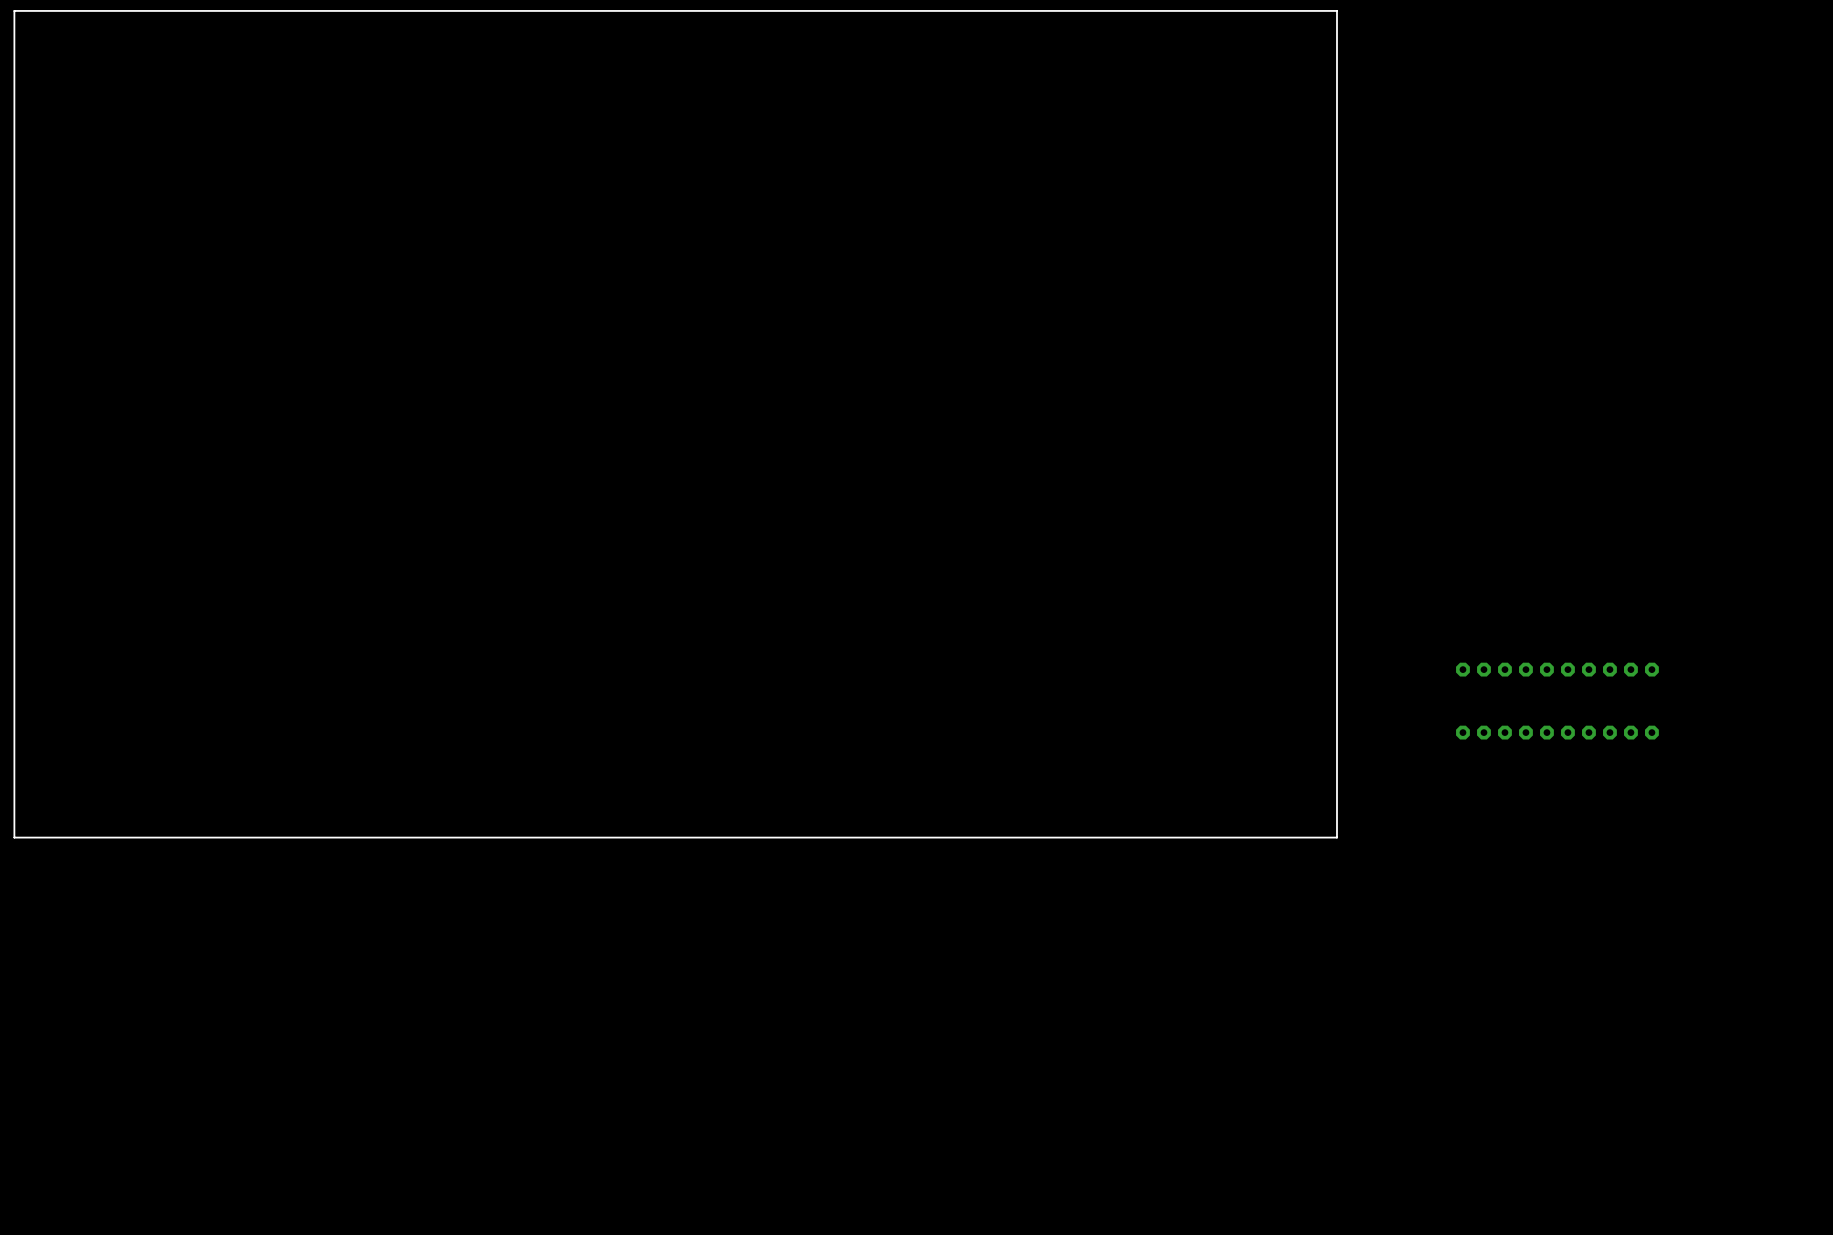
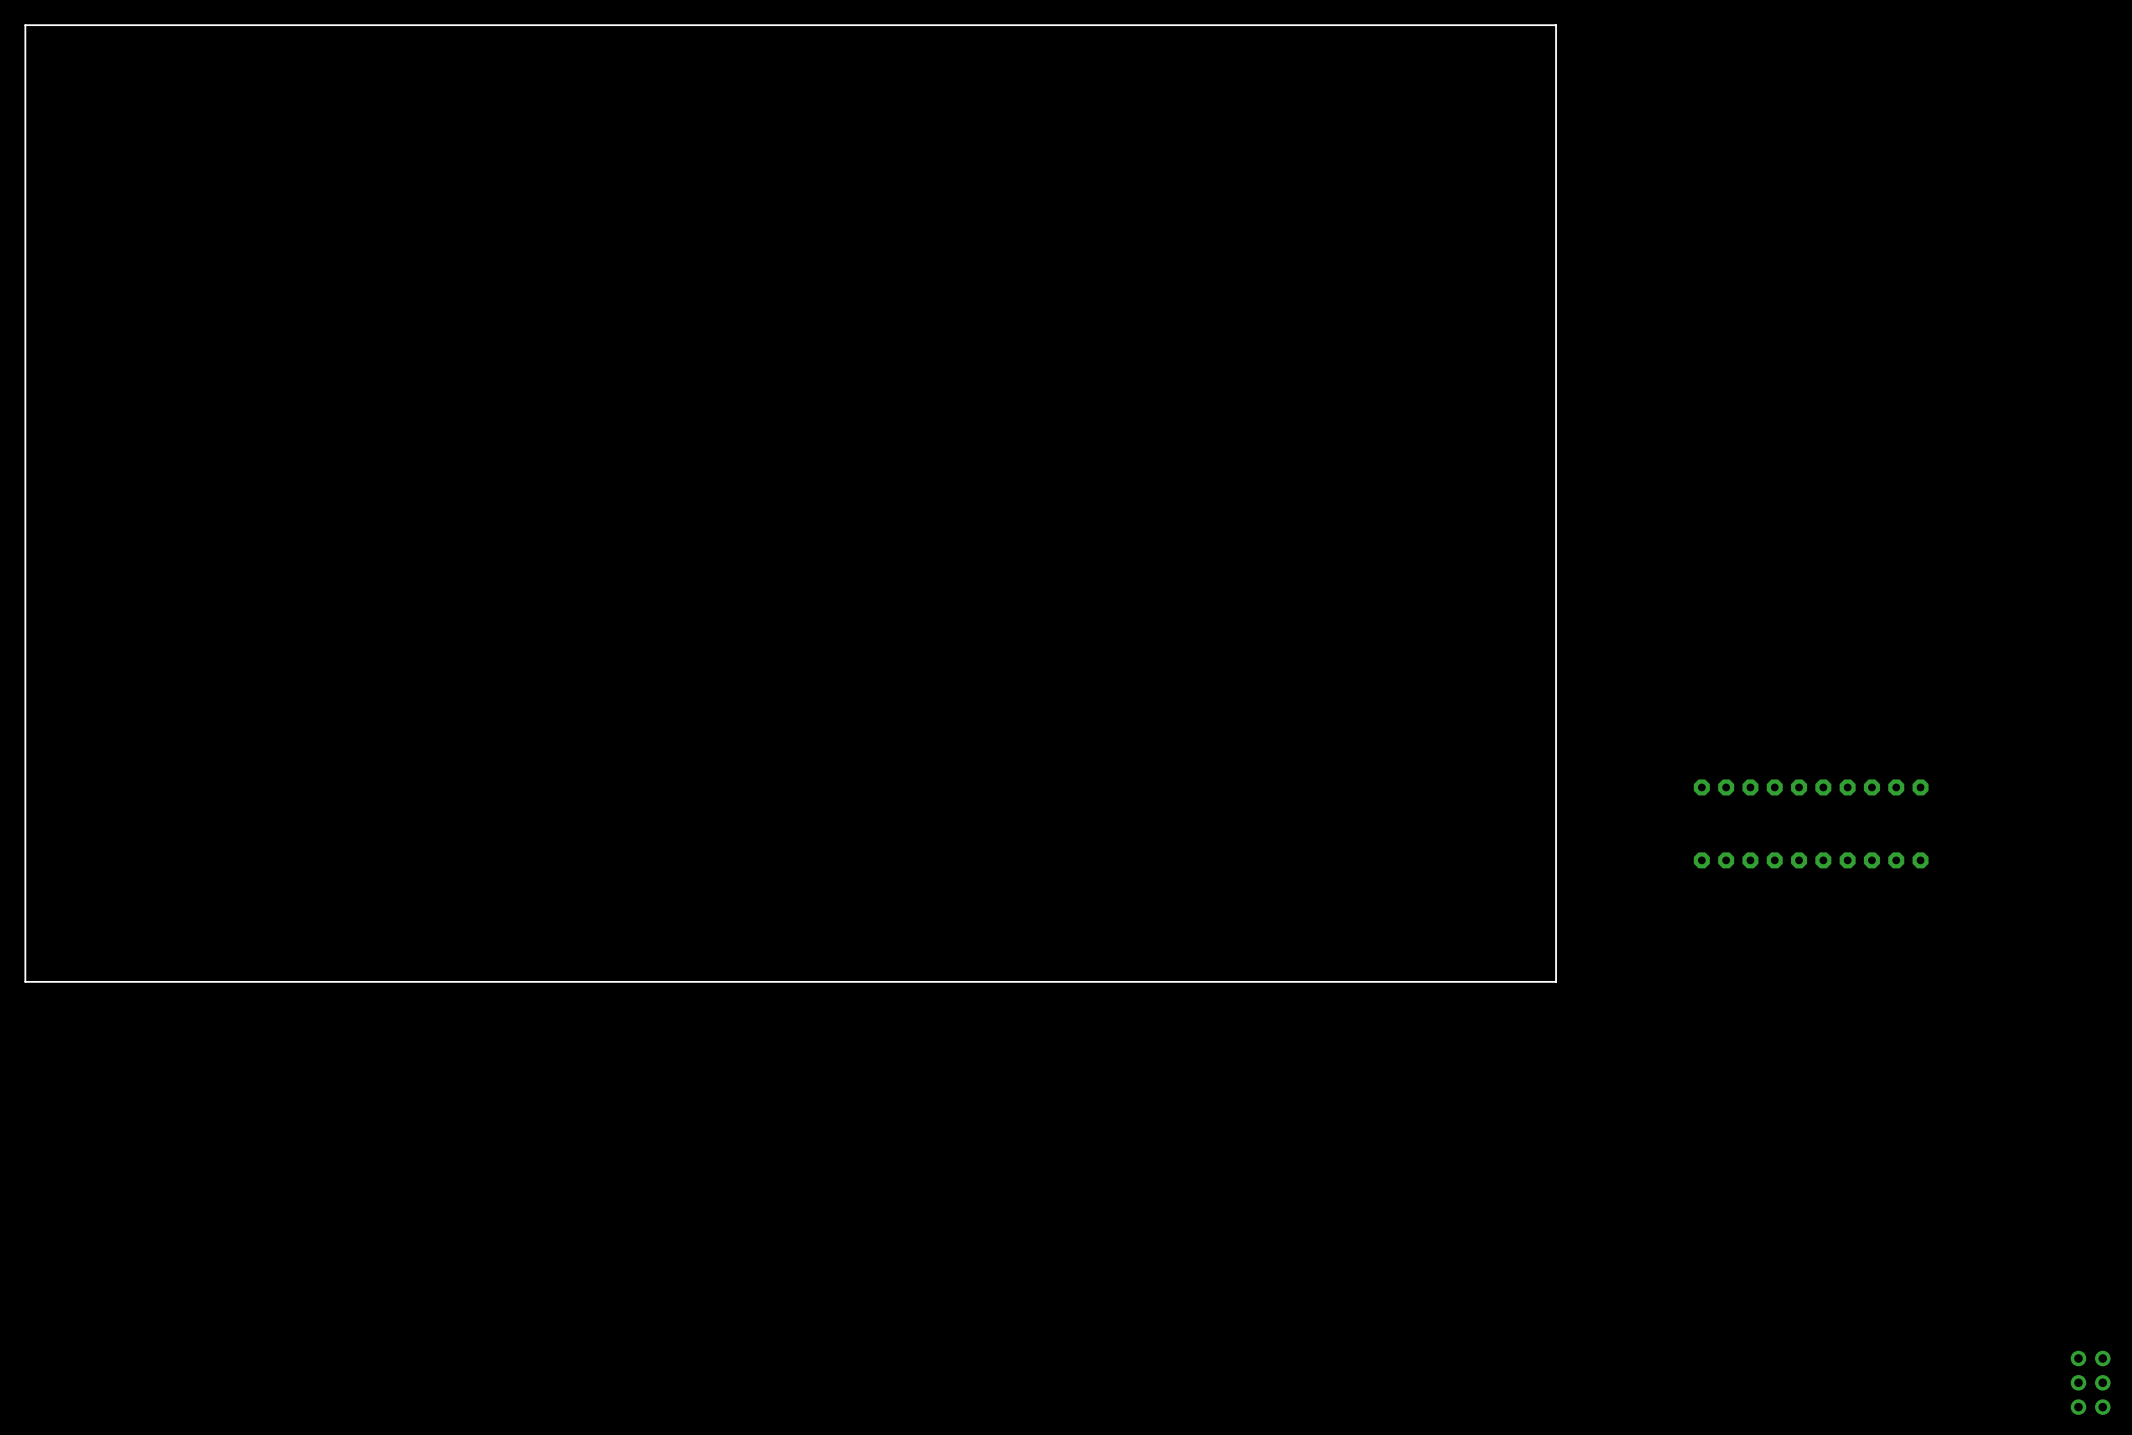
part: none -> (2090, 1382)

